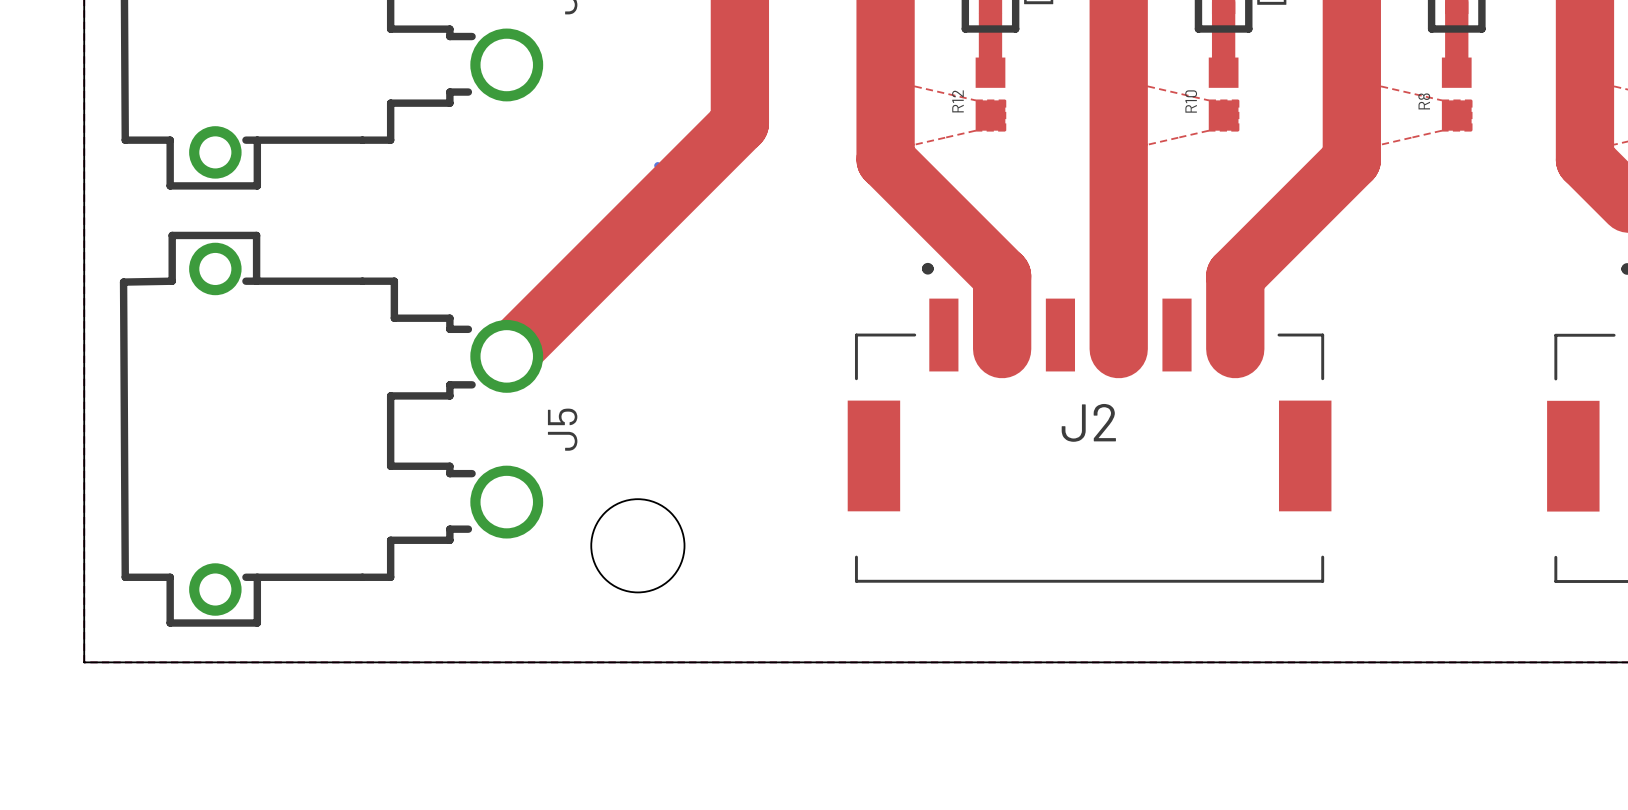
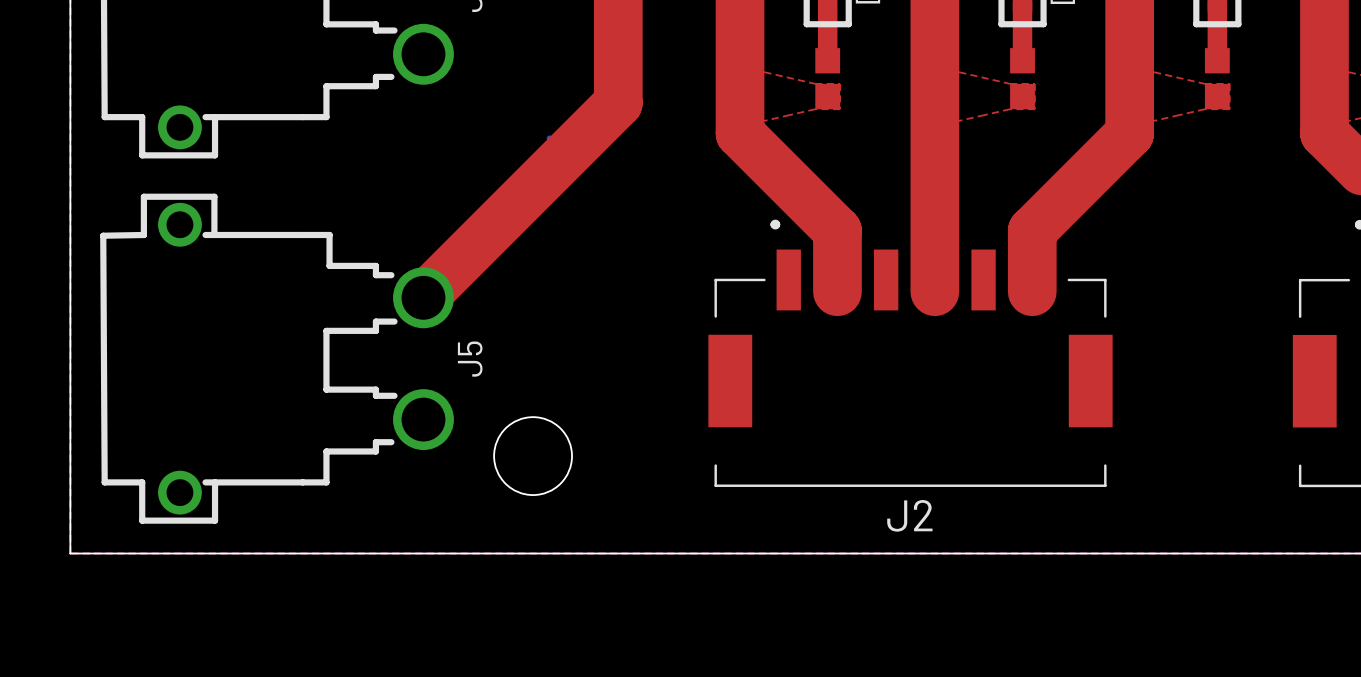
R12 name: R12 (957, 101) -> none
R10 name: R10 (1191, 101) -> none
R8 name: R8 (1424, 101) -> none
J2 name position: J2 (1088, 422) -> J2 (909, 515)

